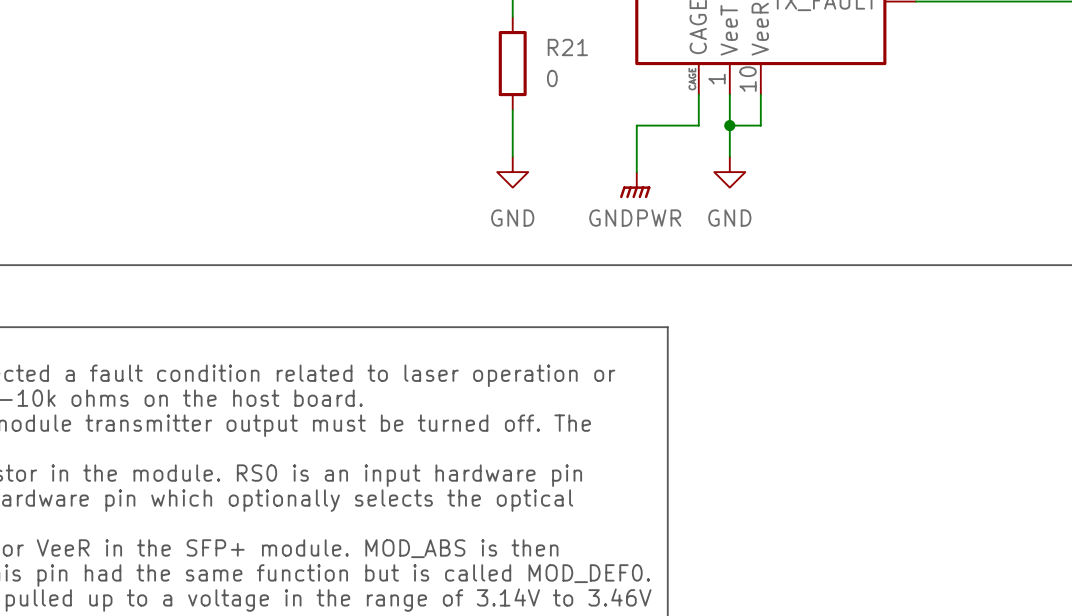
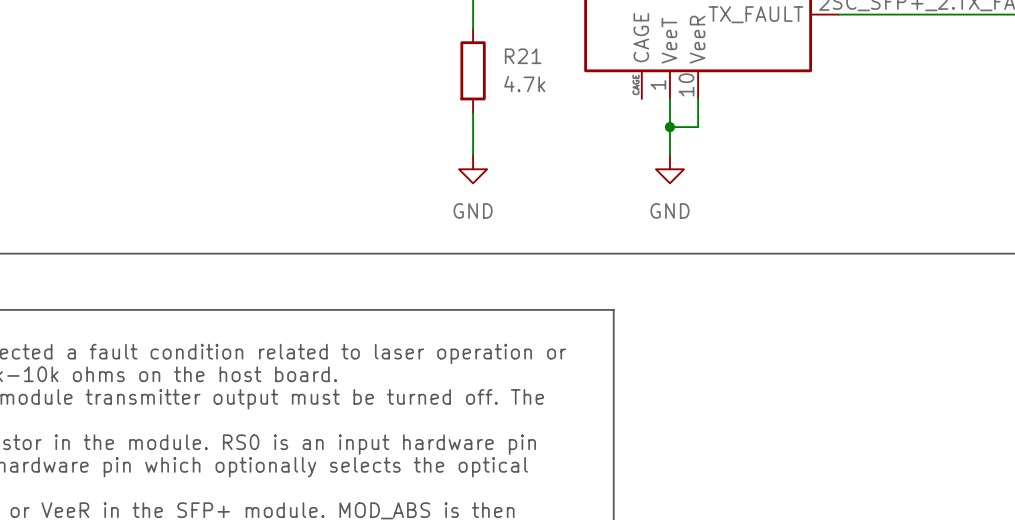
R21 value: 0 (552, 78) -> 4.7k (524, 84)
wire: (698, 94) (698, 125) (636, 125) (636, 172) -> none
power symbol: GNDPWR (635, 185) -> none

